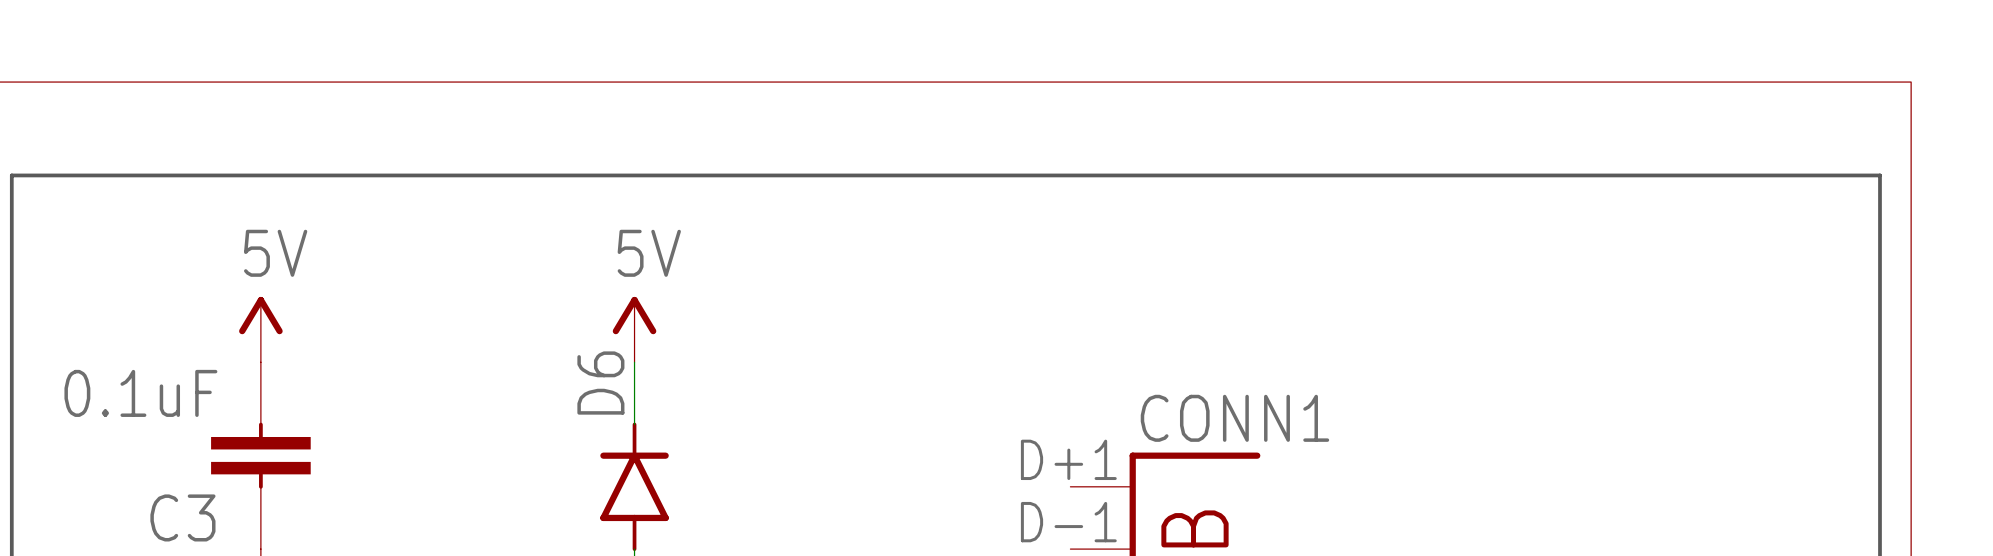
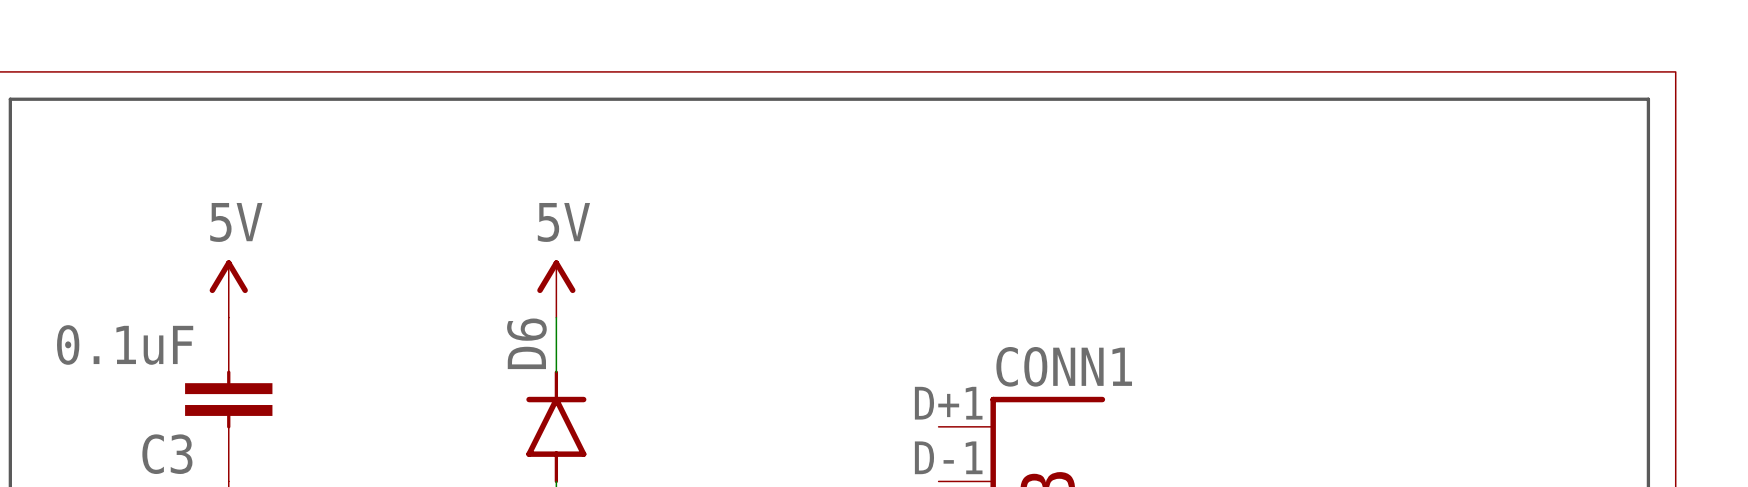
line: (11, 175) (1879, 175) -> (10, 153) (10, 99) (1648, 99) (1648, 153)

